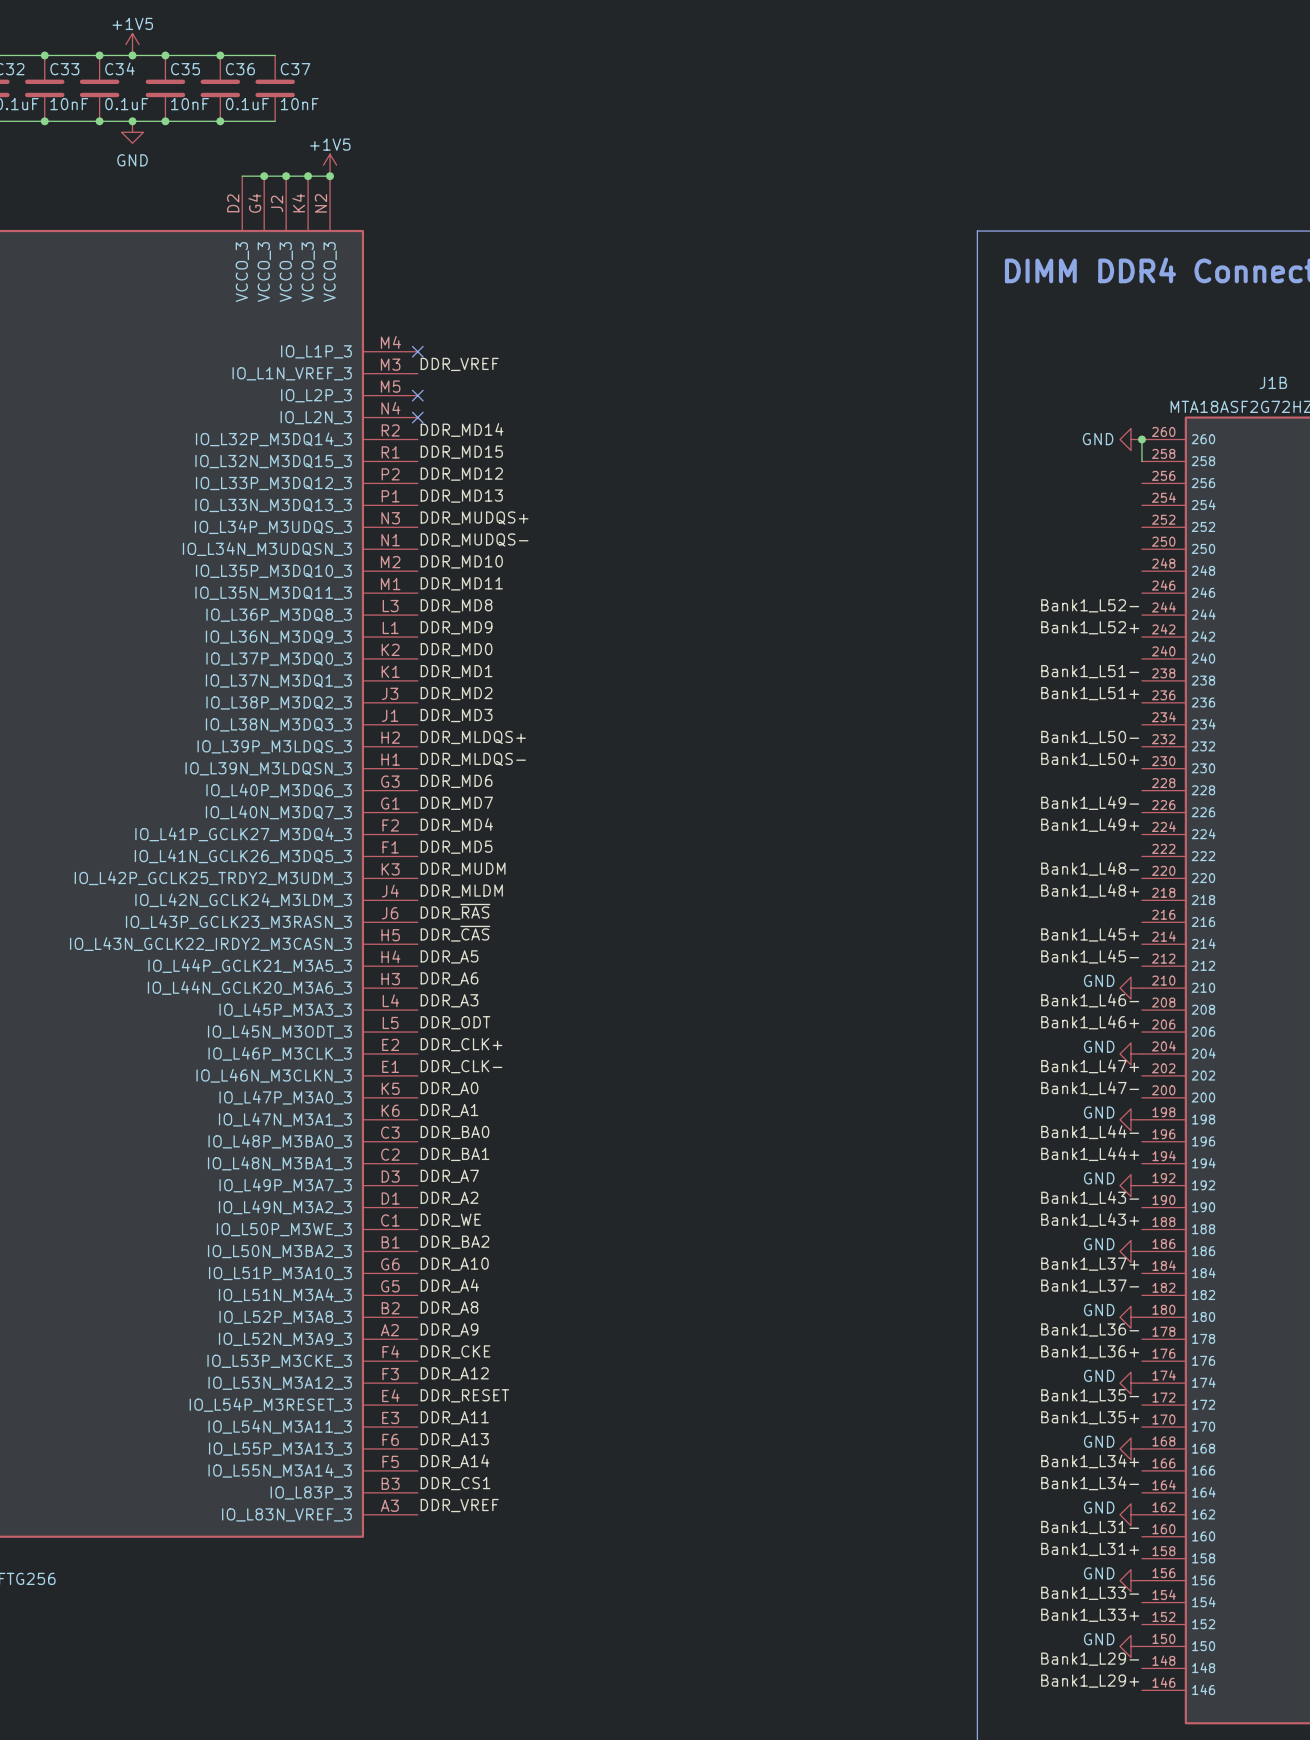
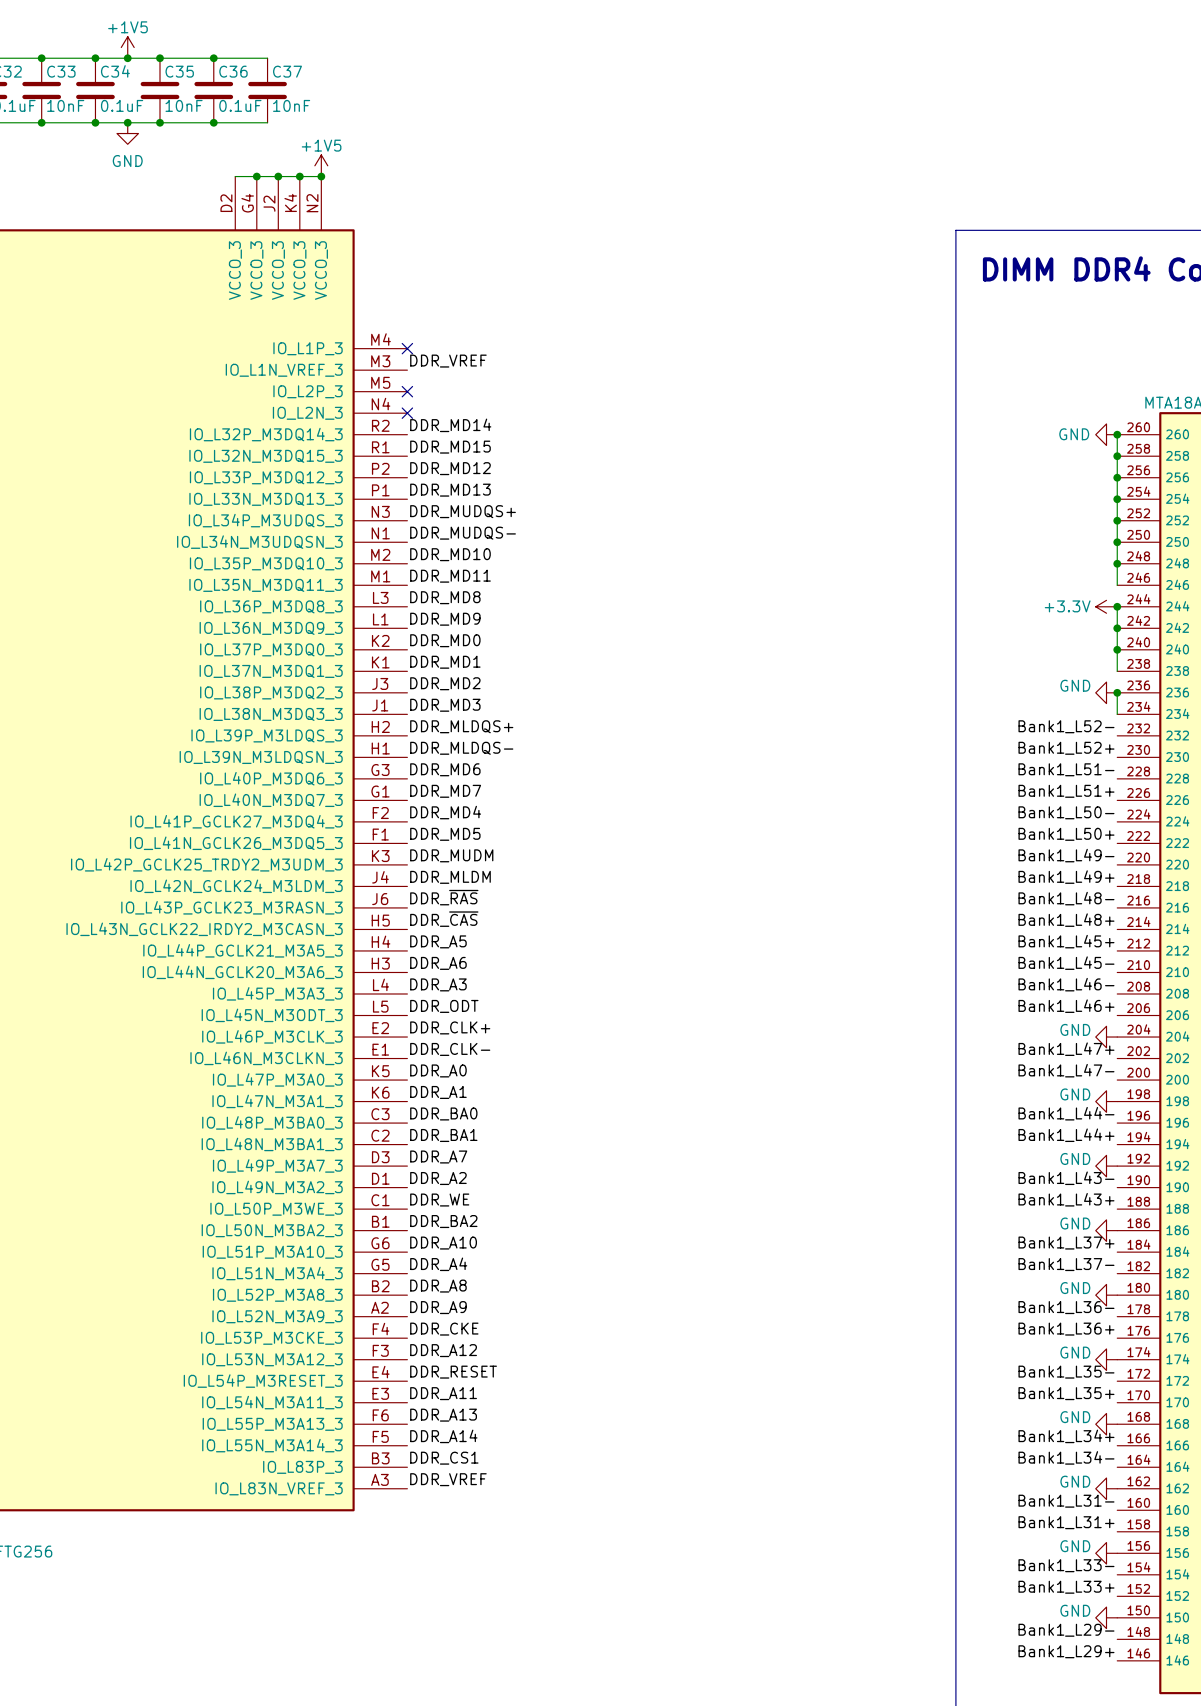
wire: none -> (1117, 456) (1117, 585)
junction: none -> (1117, 456)
junction: none -> (1117, 477)
junction: none -> (1117, 499)
junction: none -> (1117, 520)
junction: none -> (1117, 542)
junction: none -> (1117, 563)
label: Bank1_L52- (1090, 605) -> none
power symbol: none -> +3.3V (1106, 606)
wire: none -> (1117, 606) (1117, 671)
junction: none -> (1117, 606)
label: Bank1_L52+ (1090, 627) -> none
junction: none -> (1117, 628)
junction: none -> (1117, 649)
label position: Bank1_L51- (1090, 671) -> Bank1_L51- (1066, 769)
label: Bank1_L51+ (1090, 693) -> none
power symbol: none -> GND (1106, 692)
wire: none -> (1117, 692) (1117, 714)
junction: none -> (1117, 692)
label: Bank1_L50- (1090, 737) -> Bank1_L52- (1066, 726)
label: Bank1_L50+ (1090, 759) -> Bank1_L52+ (1066, 748)
label: Bank1_L49- (1090, 803) -> Bank1_L51+ (1066, 791)
label: Bank1_L49+ (1090, 824) -> Bank1_L50- (1066, 812)
label: none -> Bank1_L50+ (1066, 834)
label: Bank1_L48- (1090, 868) -> Bank1_L49- (1066, 855)
label: Bank1_L48+ (1090, 890) -> Bank1_L49+ (1066, 877)
label: none -> Bank1_L48- (1066, 898)
label: Bank1_L45+ (1090, 934) -> Bank1_L48+ (1066, 920)
label: Bank1_L45- (1090, 956) -> Bank1_L45+ (1066, 941)
label: none -> Bank1_L45- (1066, 963)
power symbol: GND (1131, 988) -> none

